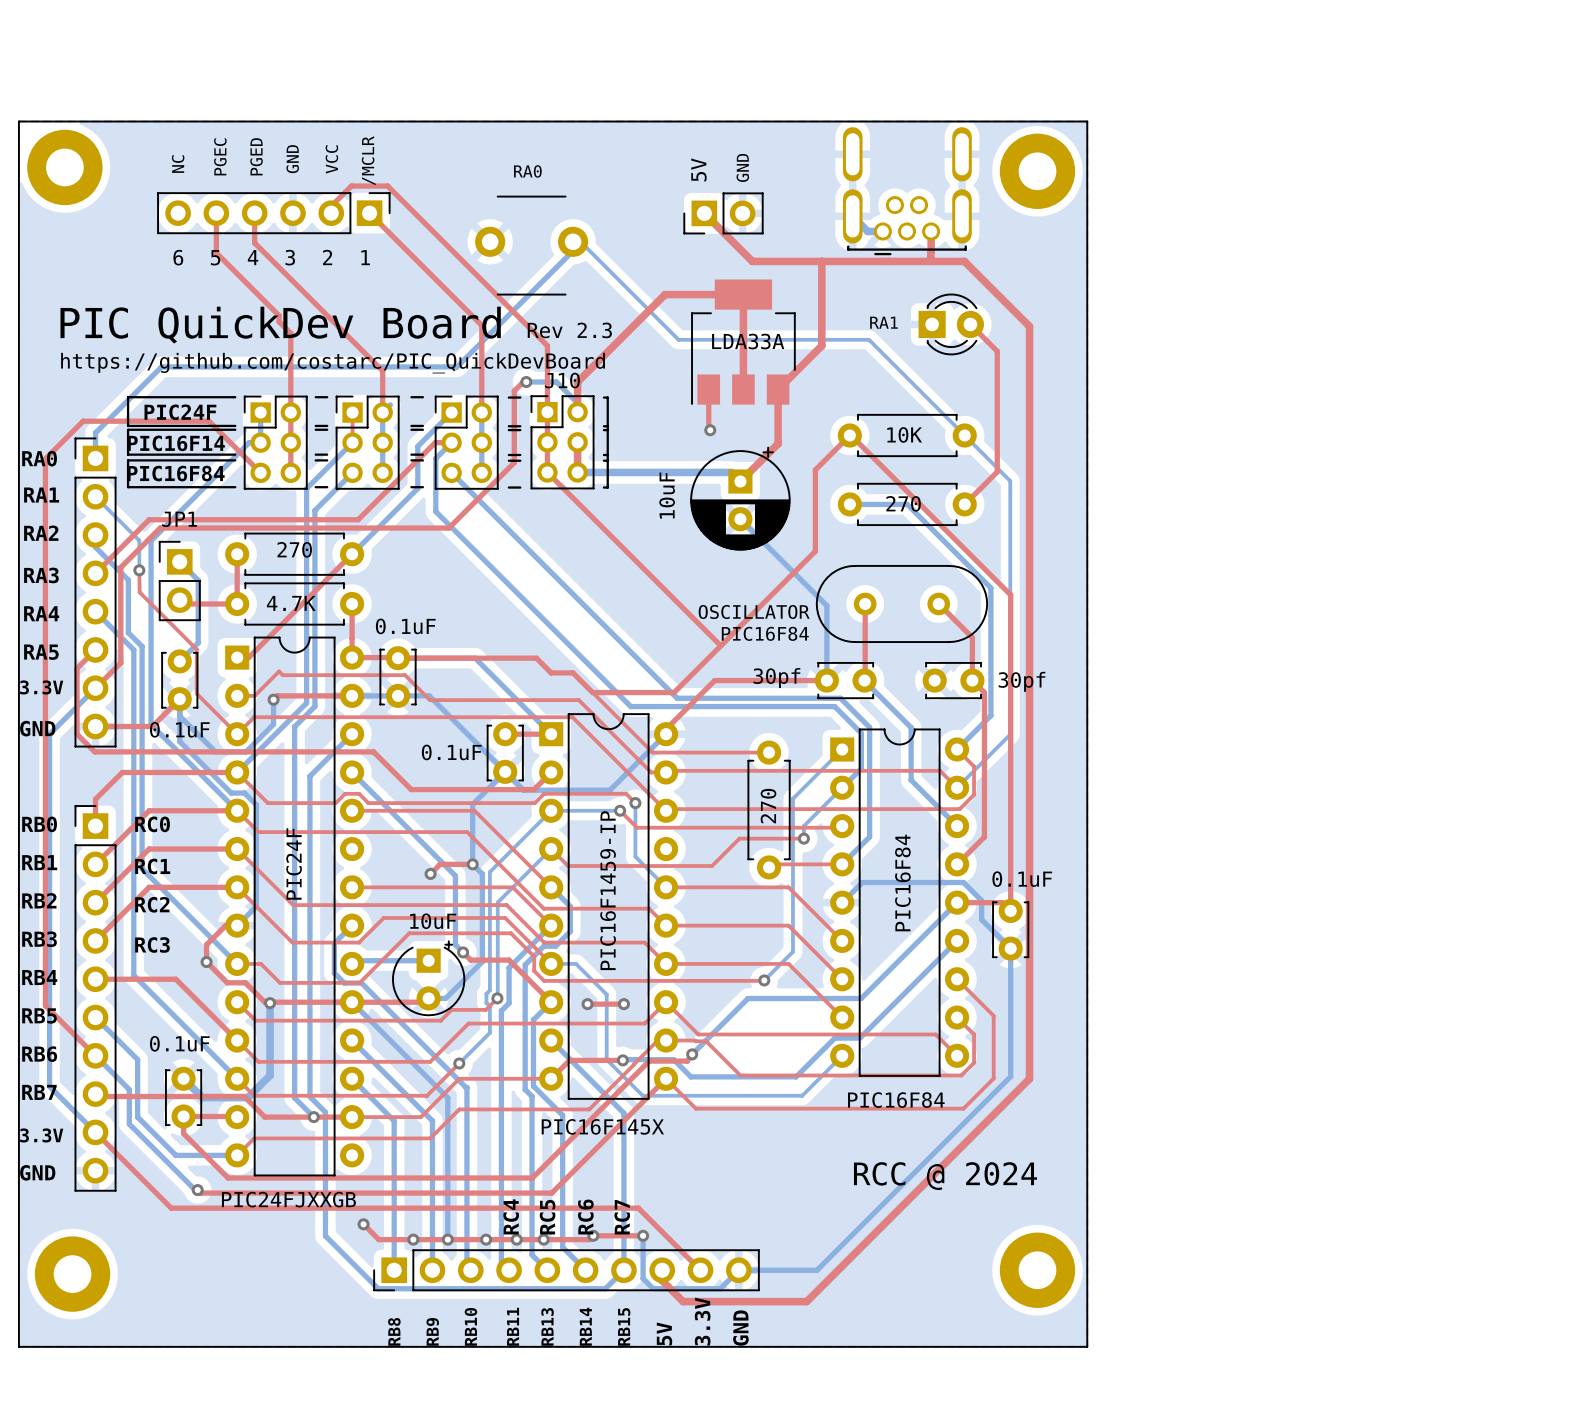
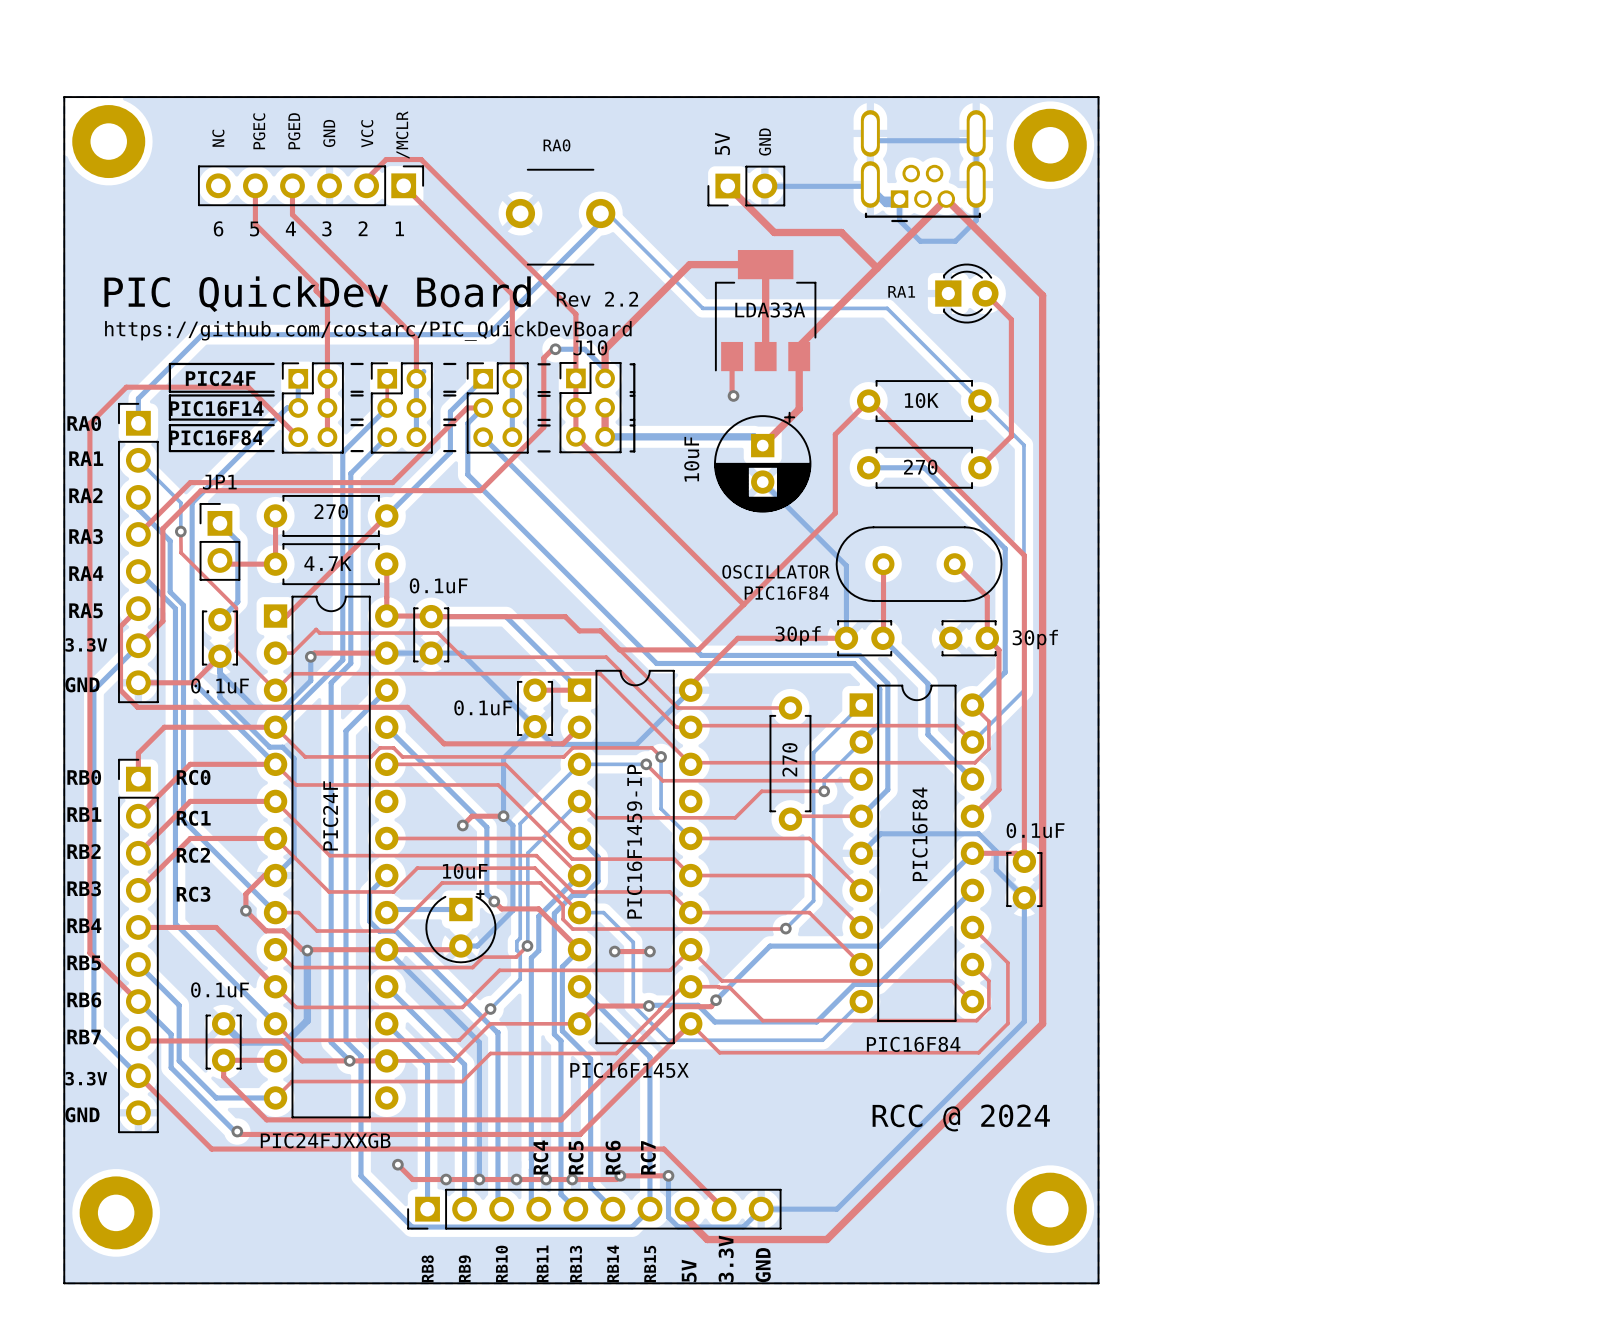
part footprint: [842, 127, 972, 256] -> [860, 110, 986, 223]
bottom track: none -> (869, 140) (976, 140) (976, 220) (955, 241) (920, 241) (899, 220) (899, 199) (882, 199) (869, 186) (765, 186)
top track: (931, 231) (930, 261) -> none
top track: none -> (841, 232) (877, 268)
top track: (964, 261) (821, 261) (821, 345) (778, 389) -> (979, 232) (946, 199) (799, 346) (799, 356)
text: Rev 2.3 (569, 330) -> Rev 2.2 (597, 299)

